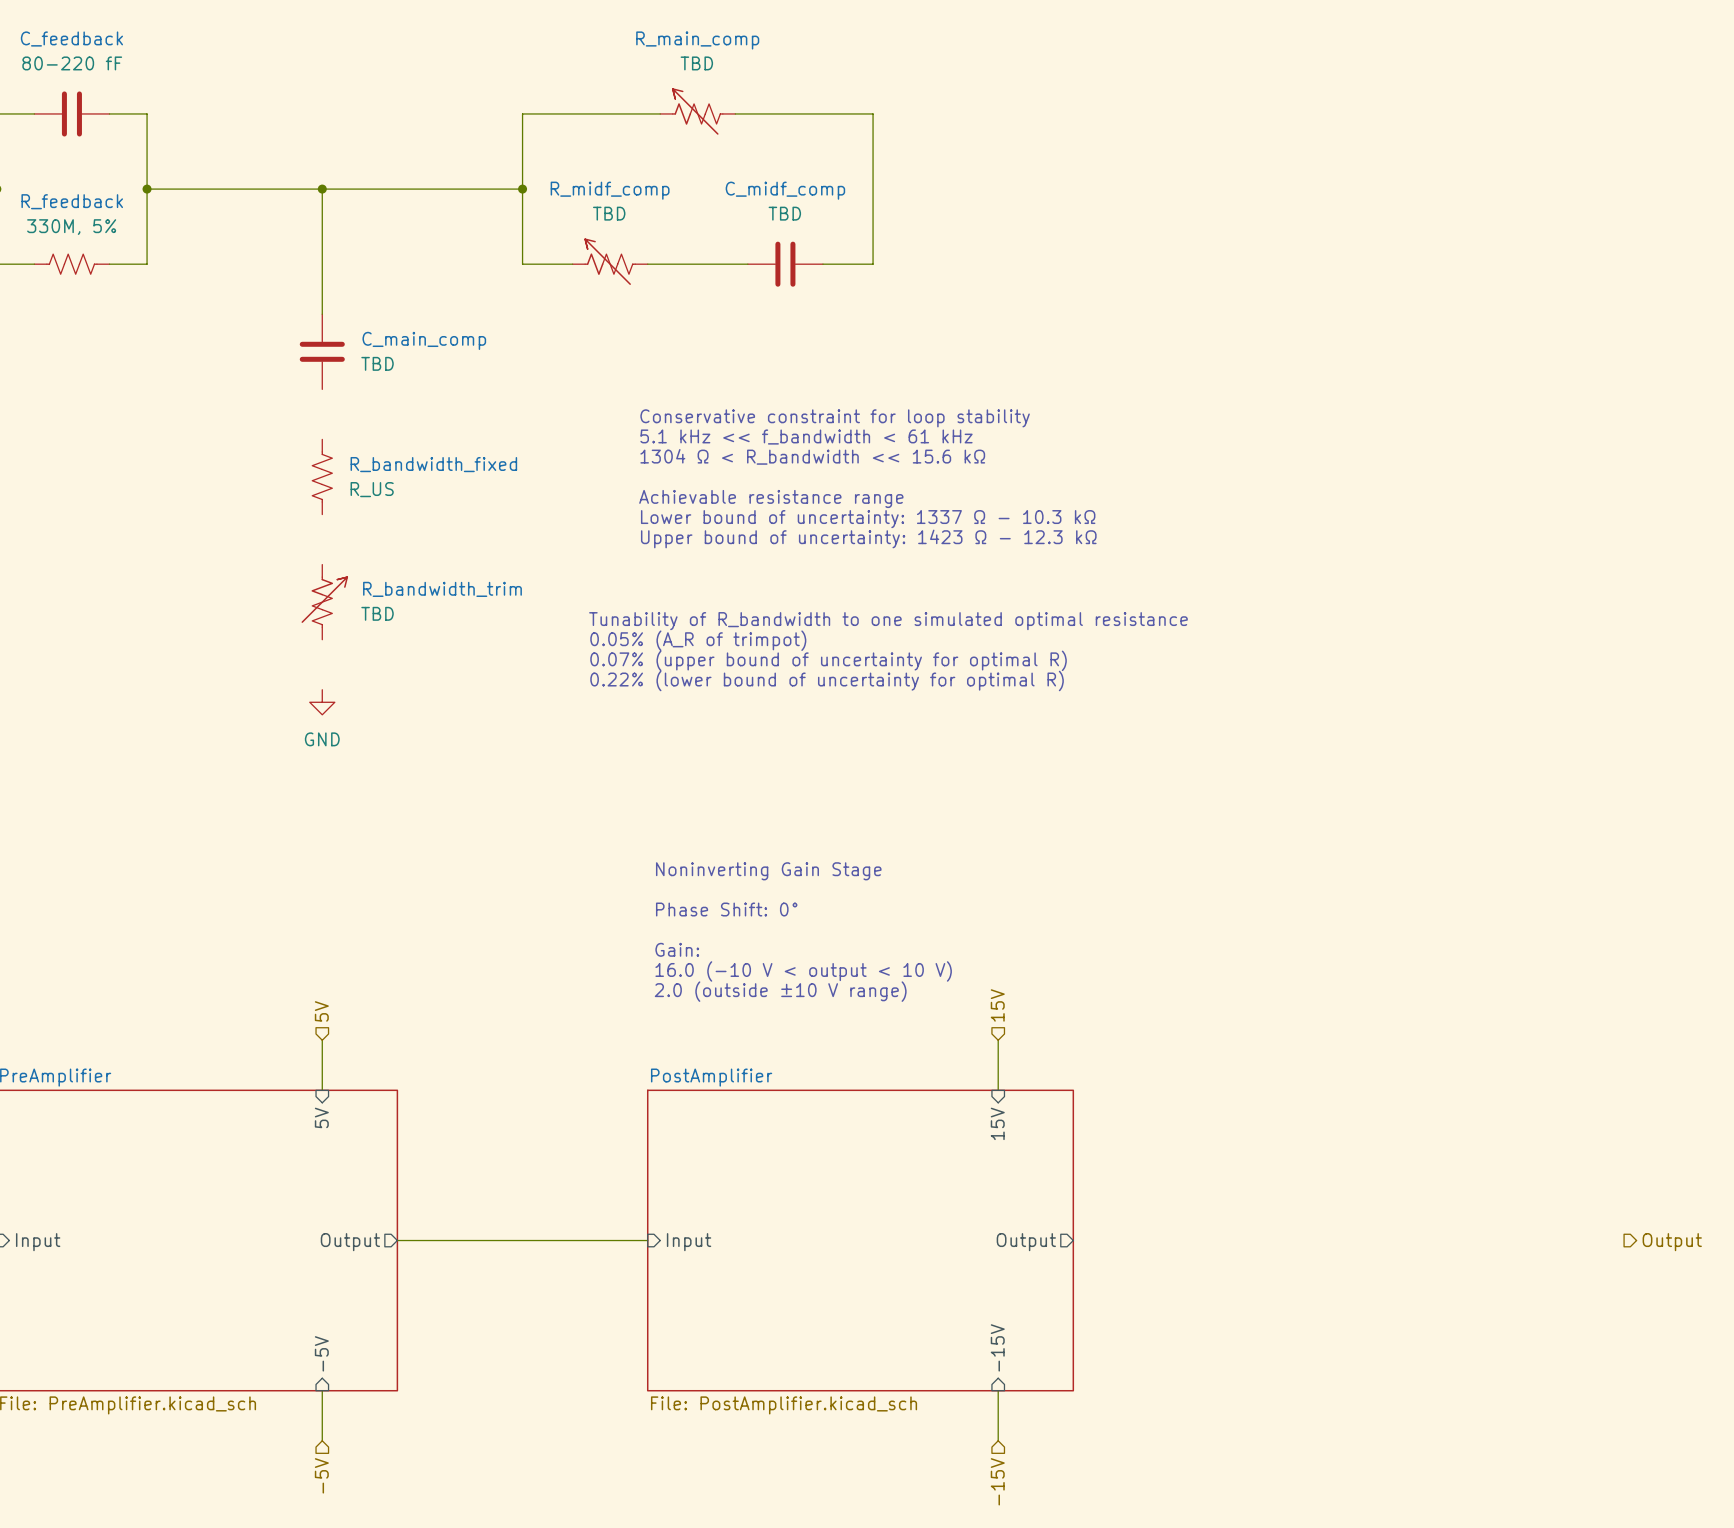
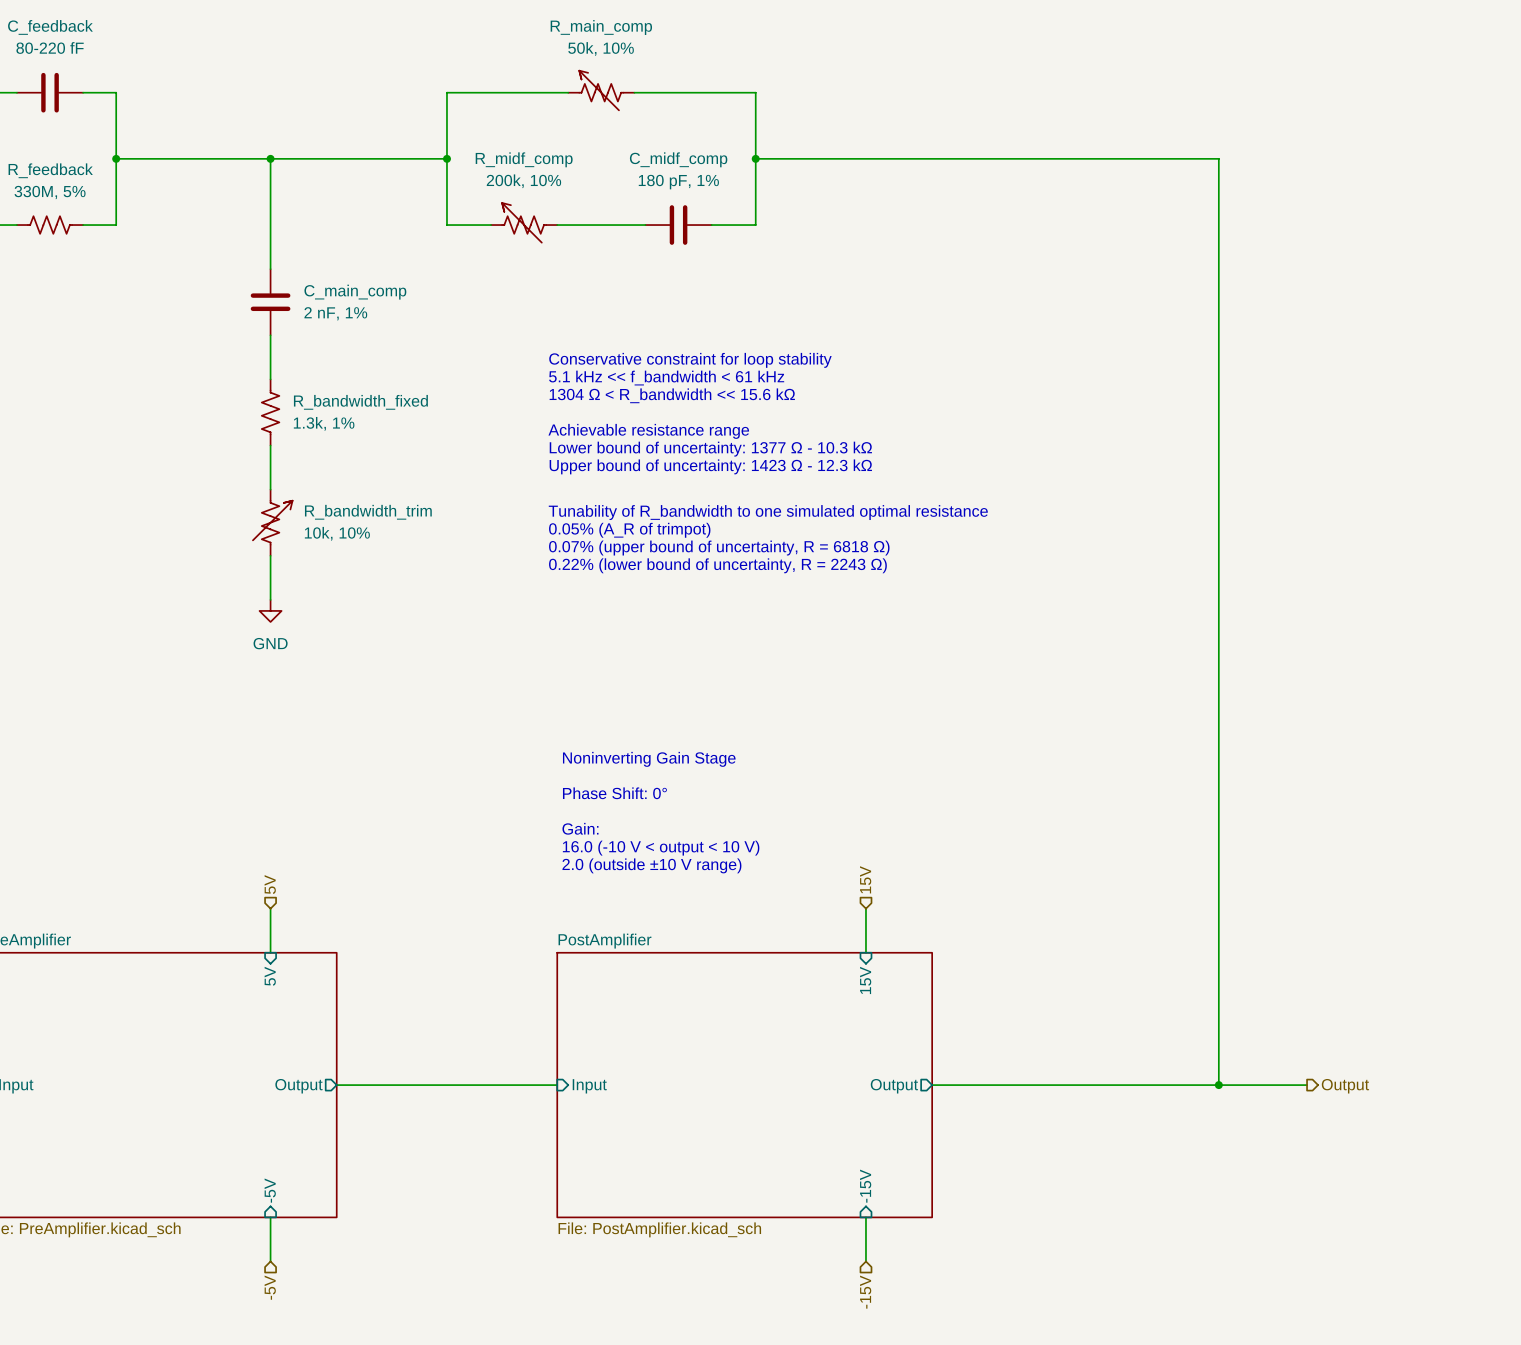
R_main_comp value: TBD (696, 63) -> 50k, 10% (601, 48)
wire: none -> (755, 158) (1218, 158) (1218, 1085)
junction: none -> (755, 158)
R_midf_comp value: TBD (609, 213) -> 200k, 10% (523, 181)
C_midf_comp value: TBD (784, 213) -> 180 pF, 1% (678, 182)
C_main_comp value: TBD (377, 363) -> 2 nF, 1% (335, 313)
wire: none -> (270, 335) (270, 379)
R_bandwidth_fixed value: R_US (372, 489) -> 1.3k, 1% (324, 423)
wire: none -> (270, 445) (270, 489)
text: Lower bound of uncertainty: 1337 Ω - 10.3 kΩ (868, 519) -> Lower bound of uncertainty: 1377 Ω - 10.3 kΩ (710, 449)
R_bandwidth_trim value: TBD (377, 613) -> 10k, 10% (337, 533)
text position: Tunability of R_bandwidth to one simulated optimal resistance (888, 621) -> Tunability of R_bandwidth to one simulated optimal resistance (768, 512)
text: none -> 0.07% (upper bound of uncertainty, R = 6818 Ω) (719, 548)
wire: none -> (270, 555) (270, 599)
text position: 0.05% (A_R of trimpot) (698, 640) -> 0.05% (A_R of trimpot) (629, 530)
text: 0.07% (upper bound of uncertainty for optimal R) (828, 660) -> 0.22% (lower bound of uncertainty, R = 2243 Ω) (717, 565)
text: 0.22% (lower bound of uncertainty for optimal R) (827, 681) -> none
wire: none -> (932, 1085) (1307, 1085)
junction: none -> (1218, 1085)
hierarchical label position: Output (1672, 1242) -> Output (1345, 1086)

